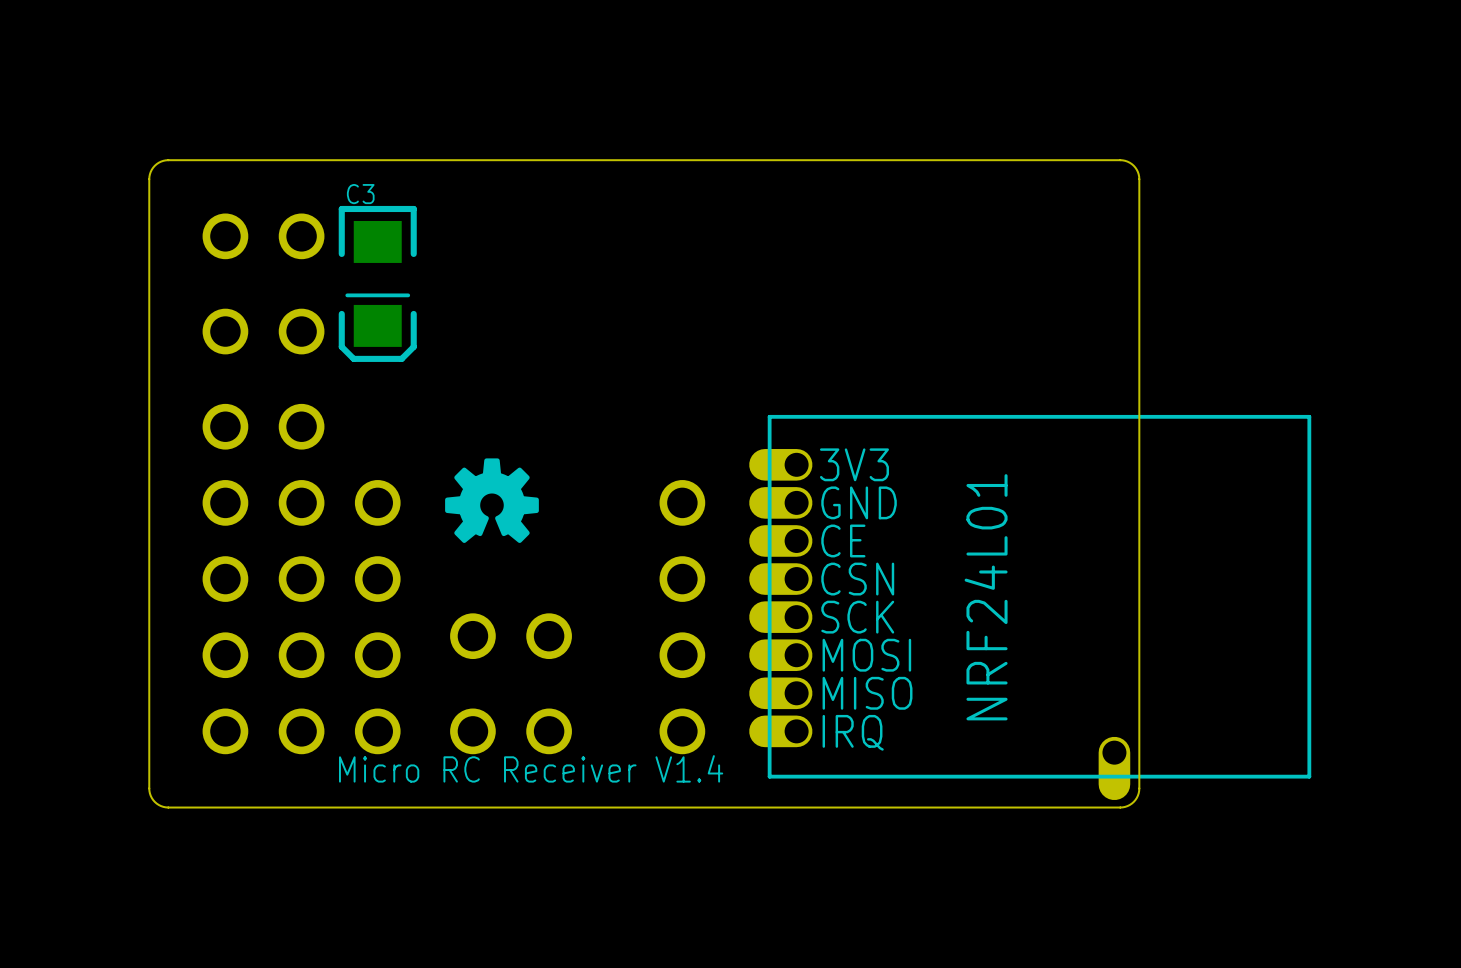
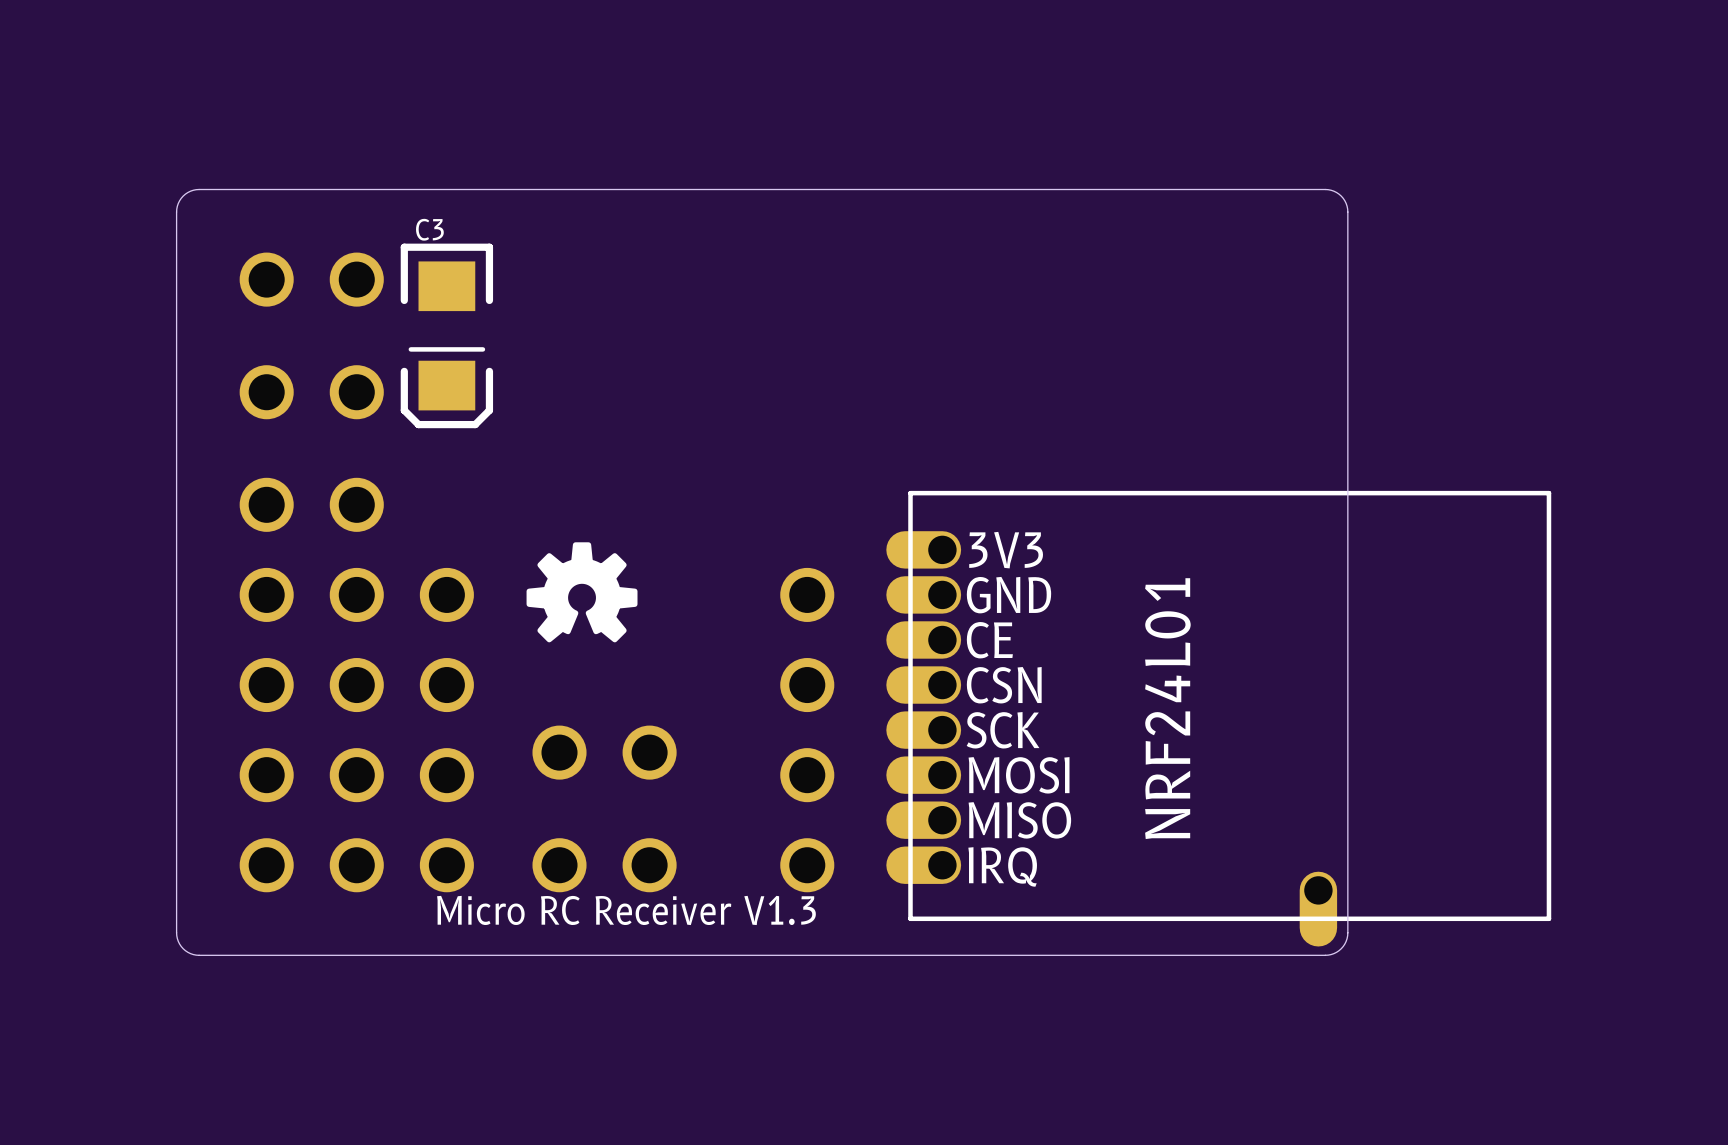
text: Micro RC Receiver V1.4 (531, 768) -> Micro RC Receiver V1.3 (626, 910)

